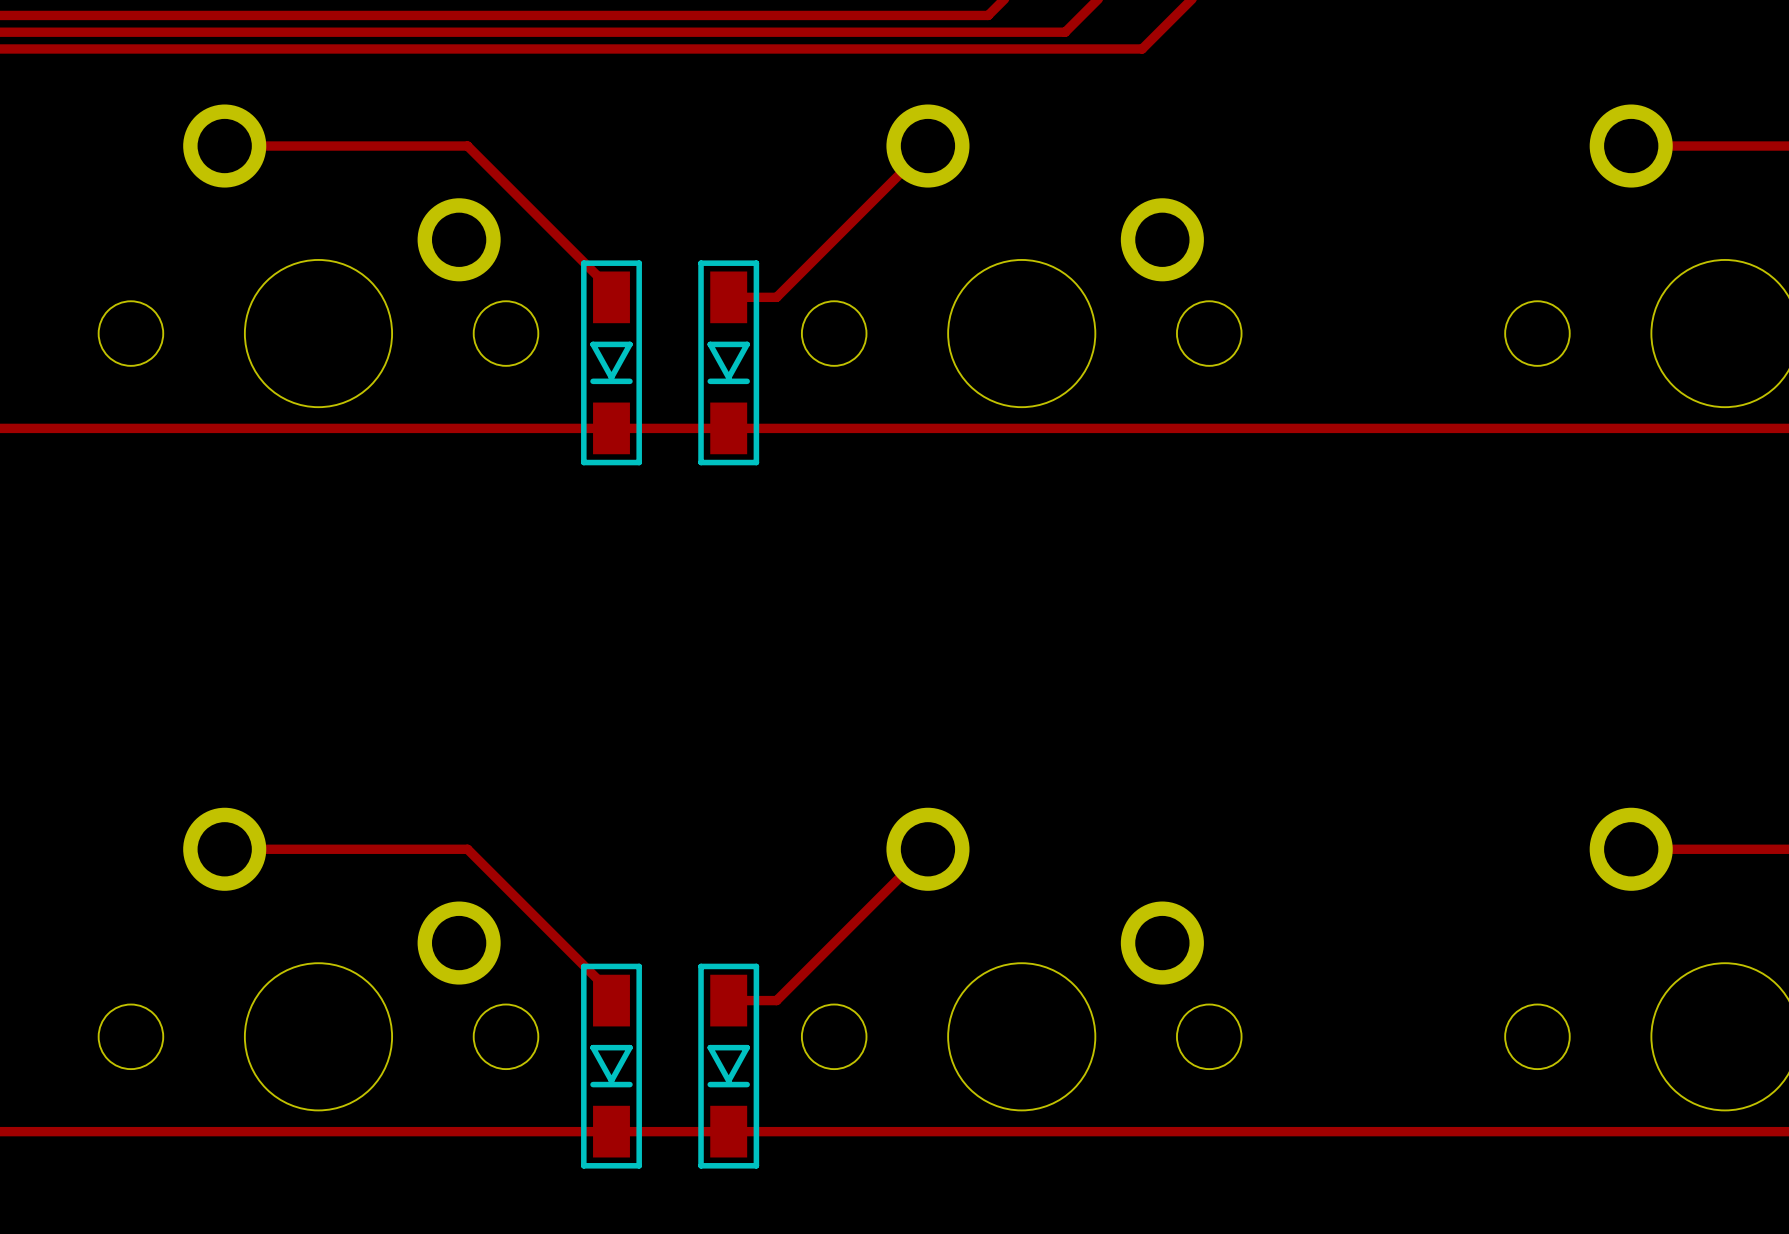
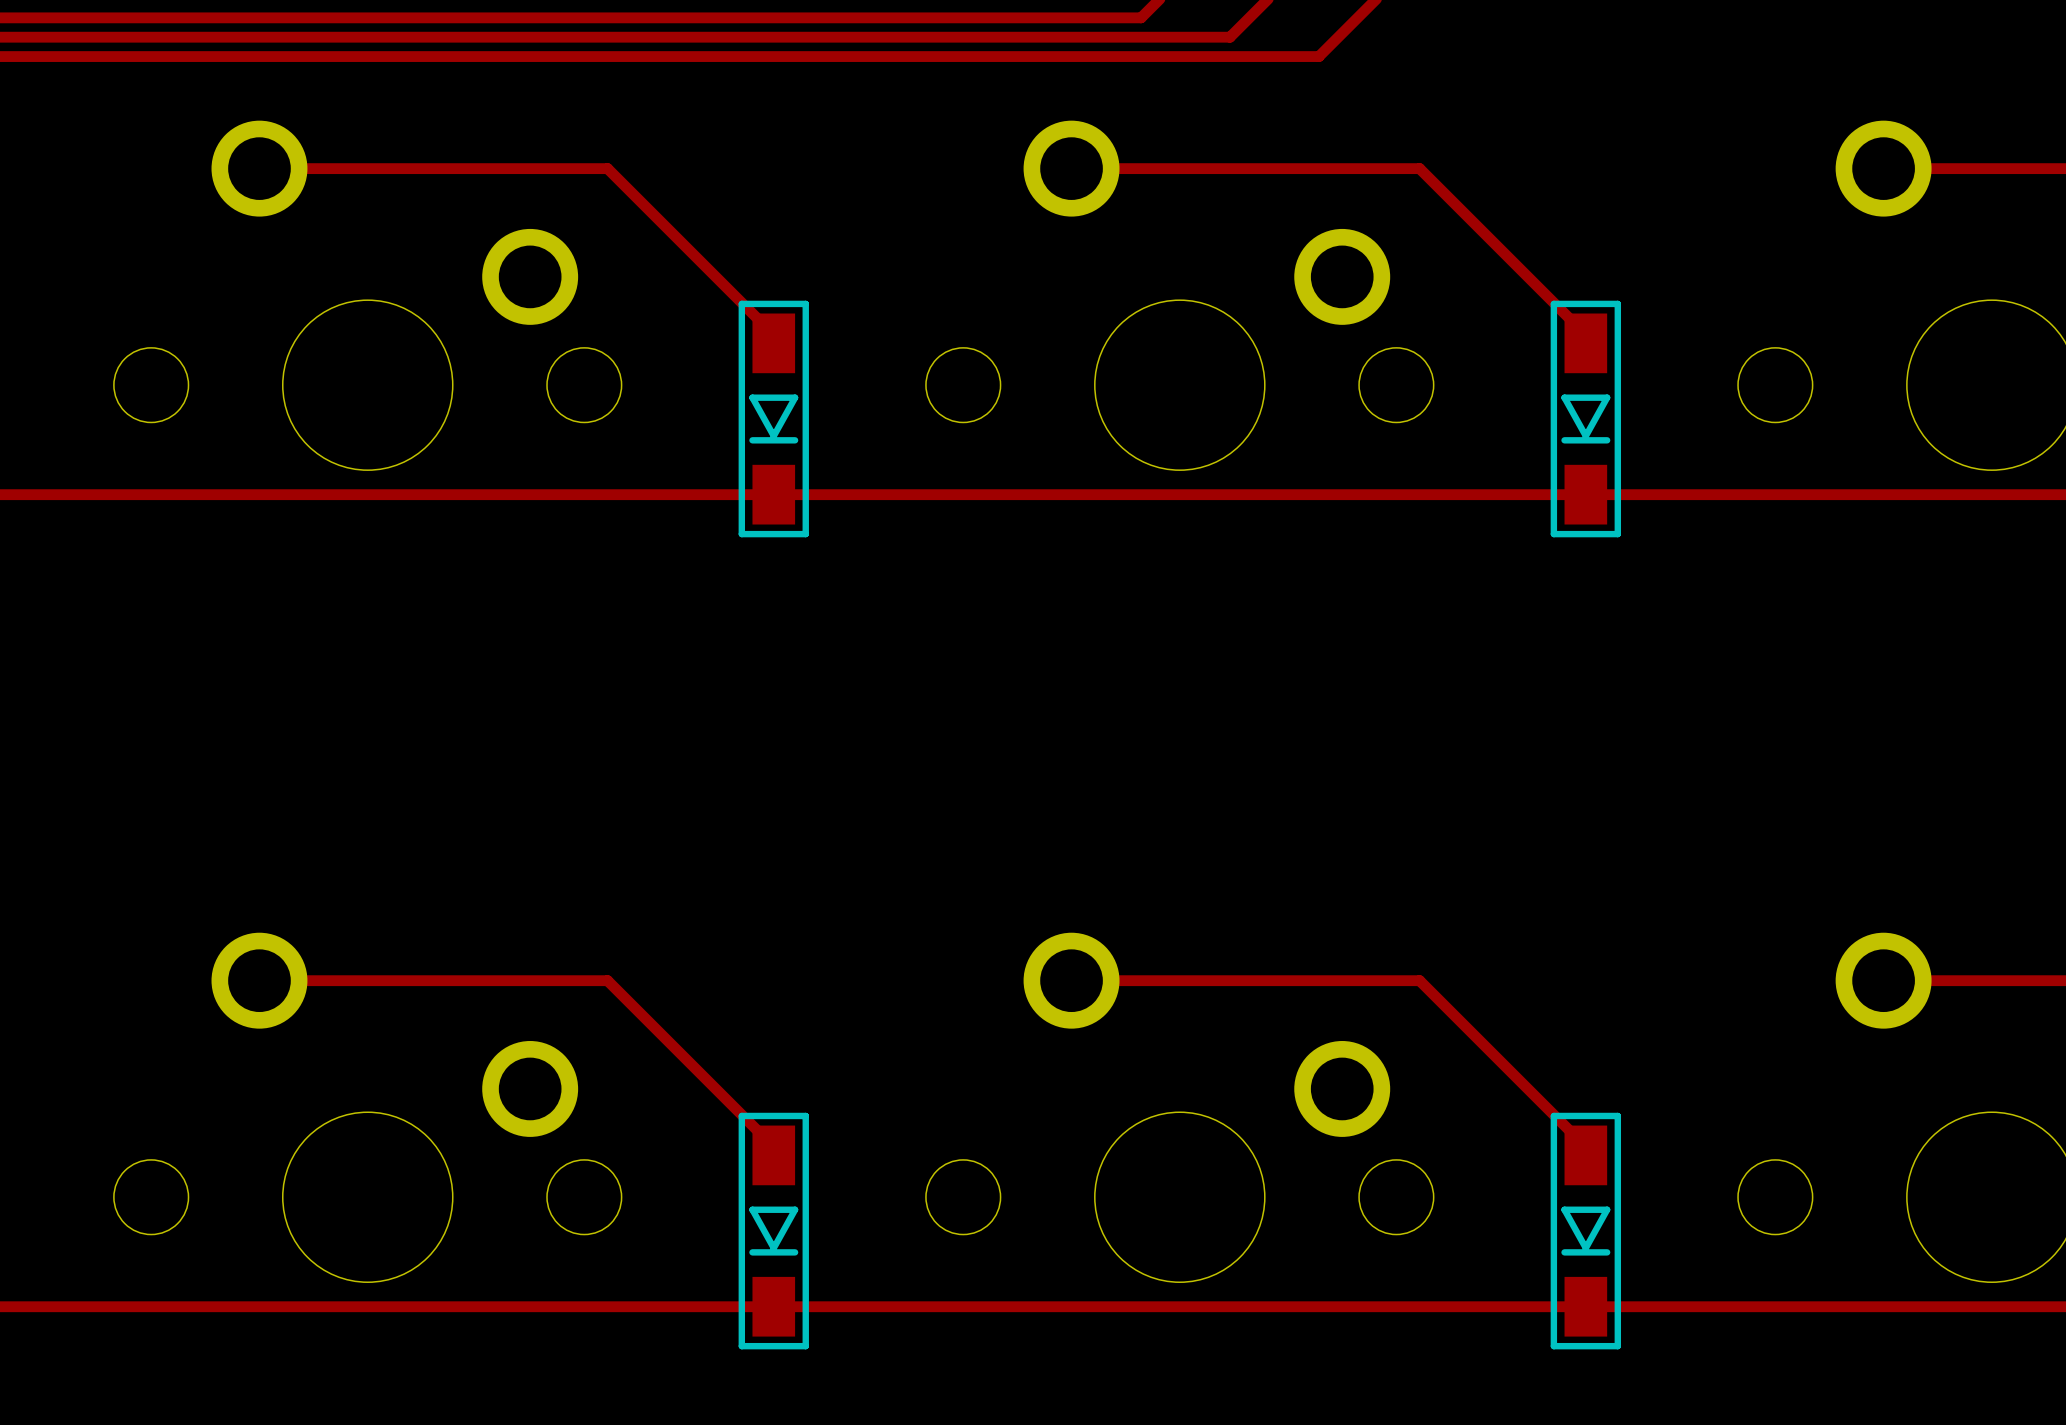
track: (467, 146) (611, 289) (611, 297) -> (539, 168) (607, 168) (773, 334) (773, 343)
track: (927, 146) (776, 297) (728, 297) -> (1071, 168) (1419, 168) (1585, 334) (1585, 343)
part: (611, 362) -> none
part: none -> (773, 419)
part: (728, 362) -> none
part: none -> (1585, 419)
track: (467, 849) (611, 993) (611, 1000) -> (539, 980) (607, 980) (773, 1146) (773, 1155)
track: (927, 849) (776, 1000) (728, 1000) -> (1071, 980) (1419, 980) (1585, 1146) (1585, 1155)
part: (611, 1066) -> none
part: none -> (773, 1231)
part: (728, 1066) -> none
part: none -> (1585, 1231)

